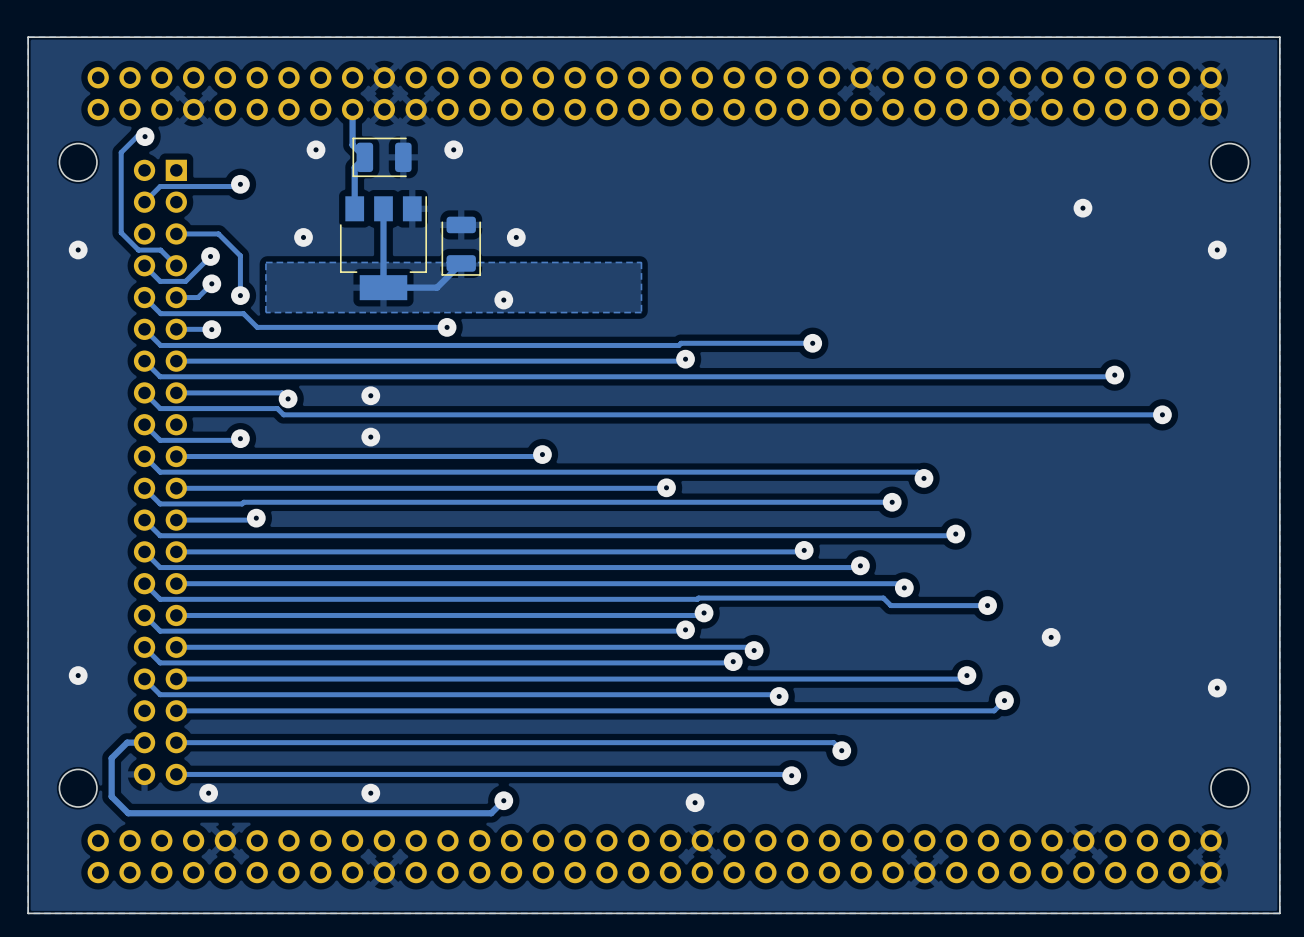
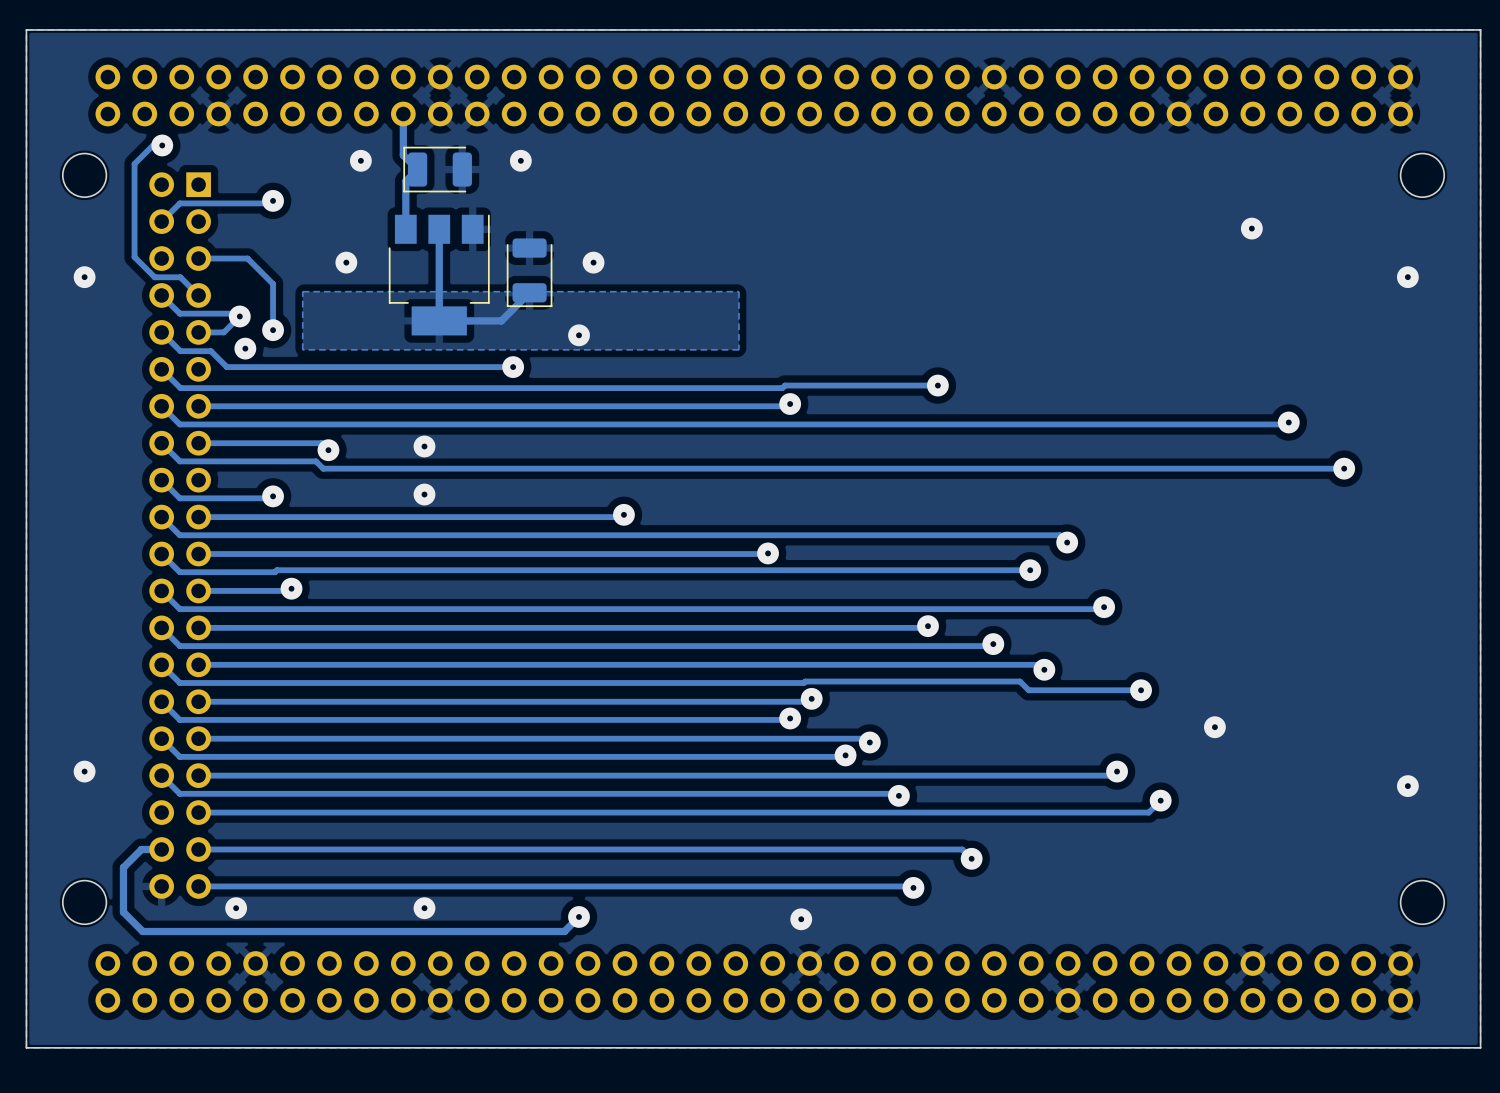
track: (210, 256) (185, 281) -> (236, 311) (234, 313) (209, 313)
via: (210, 256) -> none
track: (186, 313) (243, 313) (257, 327) -> (210, 351) (226, 367) (292, 367)
track: (176, 329) (211, 329) -> none
via position: (211, 329) -> (245, 348)

